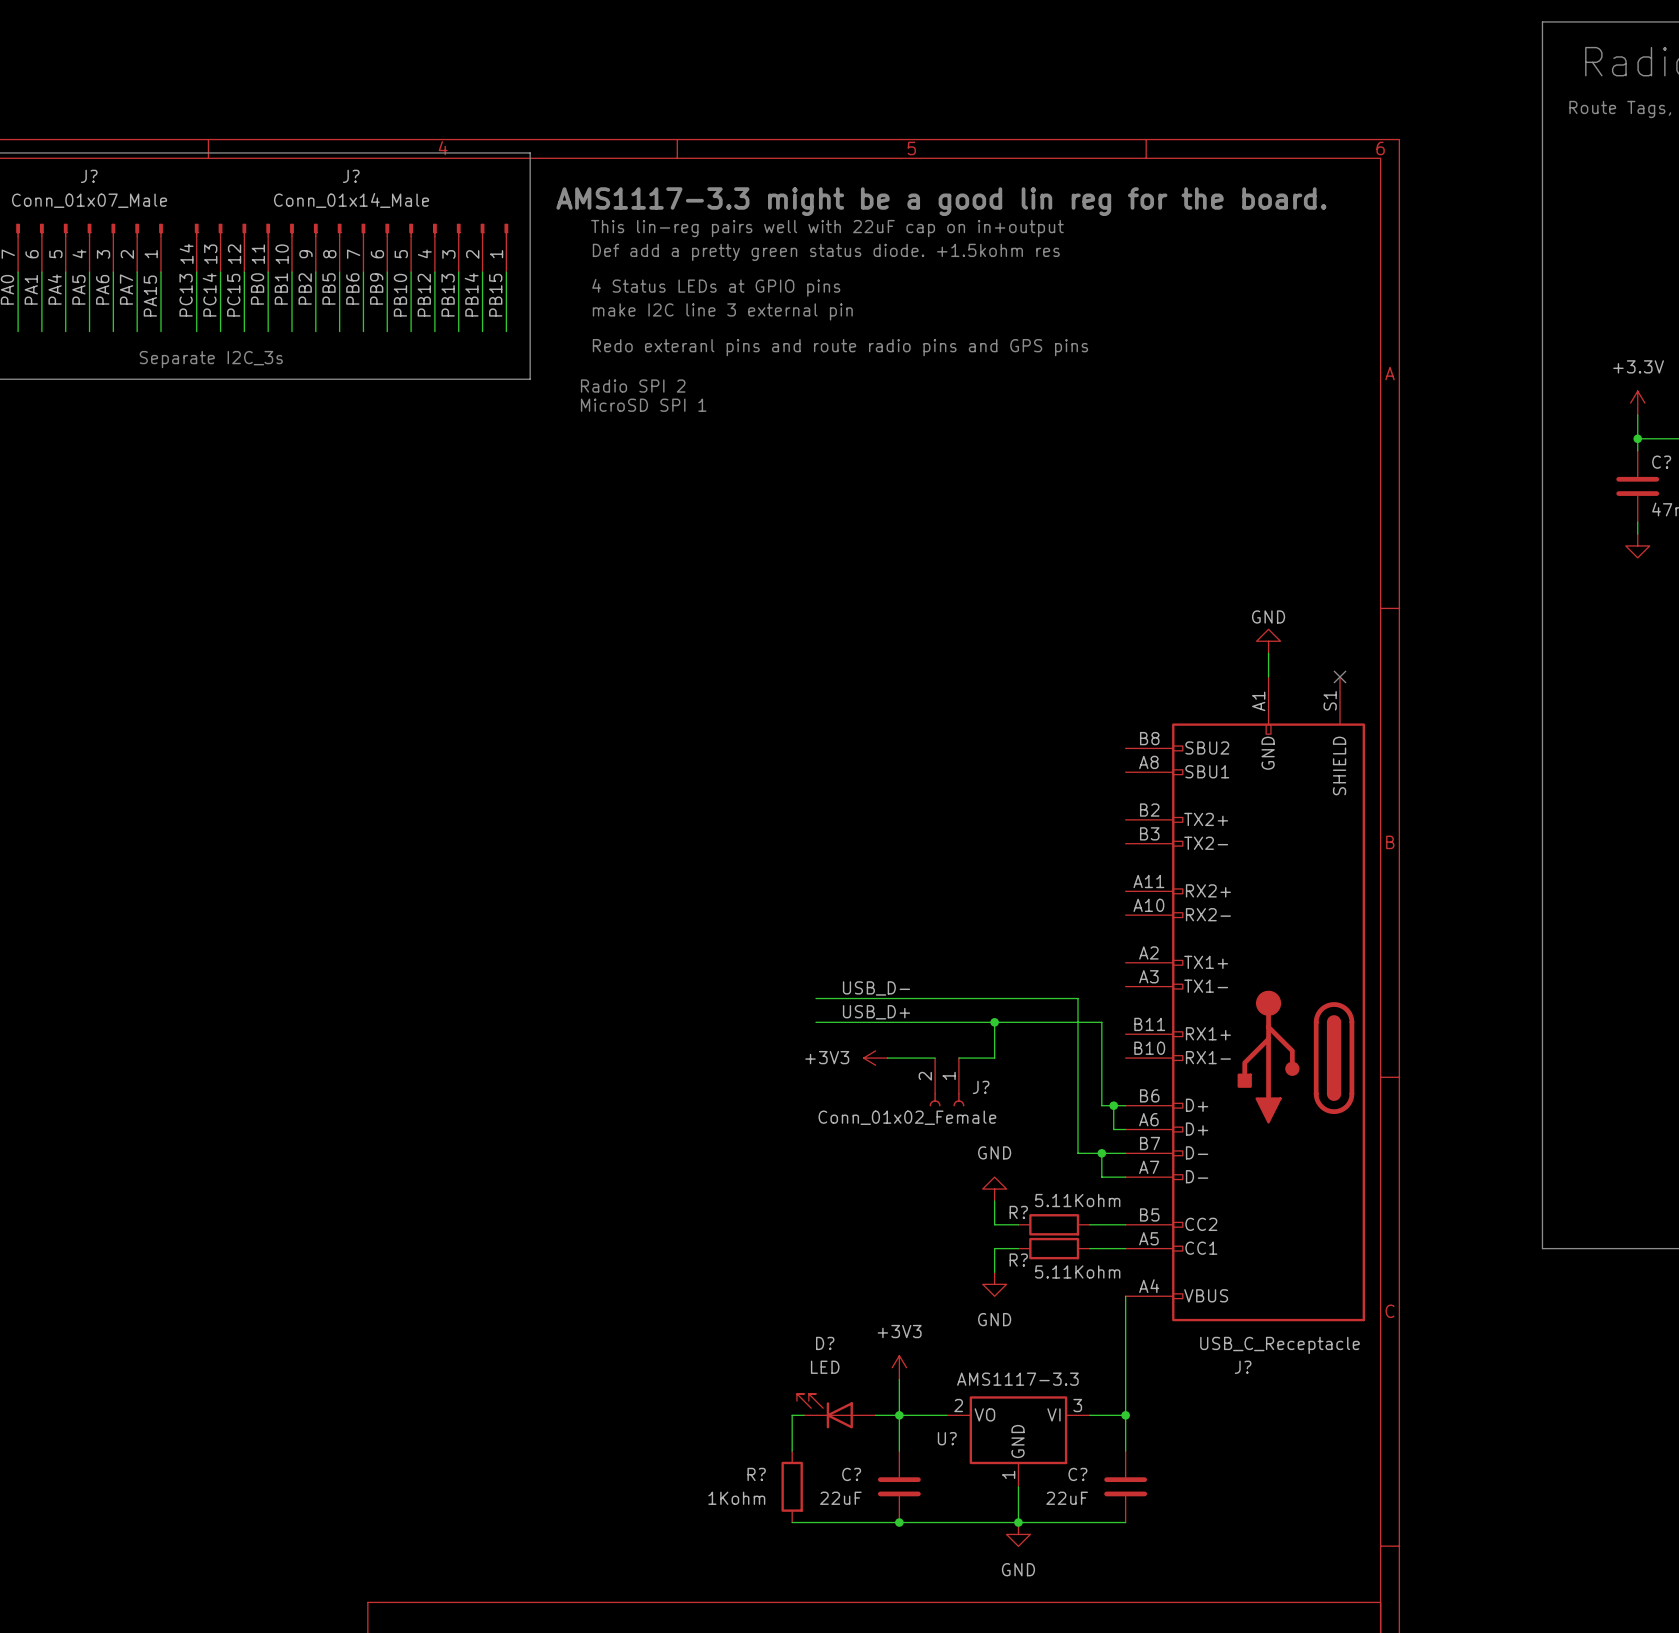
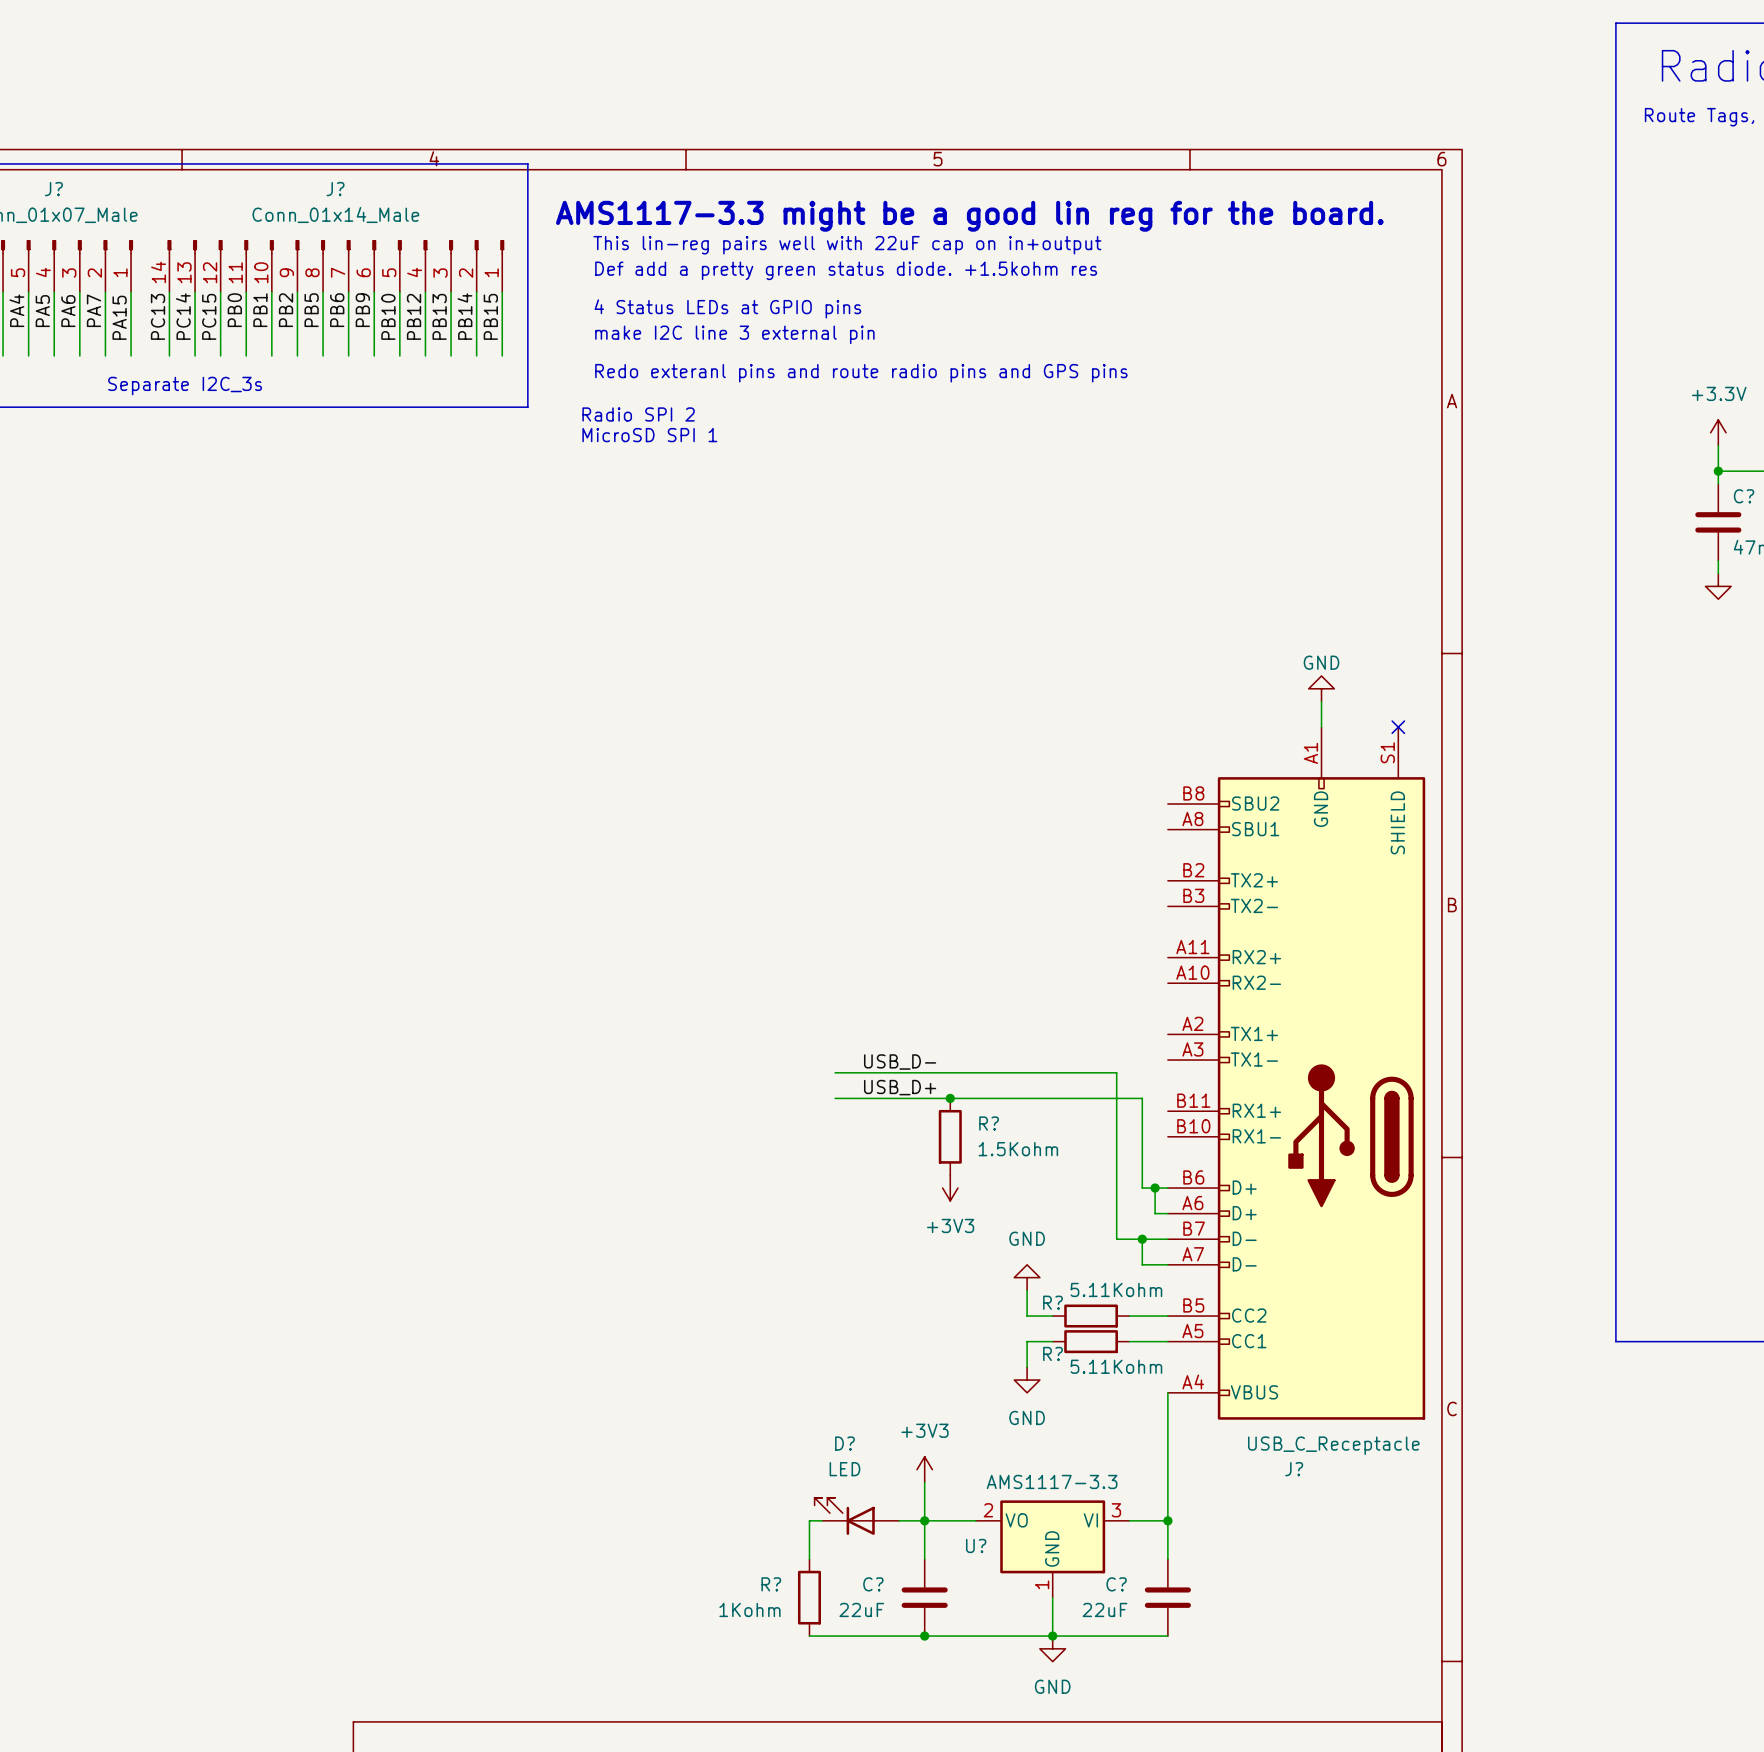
junction: none -> (950, 1098)
wire: (994, 1022) (994, 1058) (958, 1058) -> none
junction: (994, 1022) -> none
power symbol rotation: 0° (875, 1058) -> 90° counterclockwise (950, 1188)
power symbol position: +3V3 (875, 1058) -> +3V3 (950, 1188)
wire: (887, 1058) (935, 1058) -> none
R?: none -> 1.5Kohm (950, 1136)
J?: Conn_01x02_Female (947, 1082) -> none

